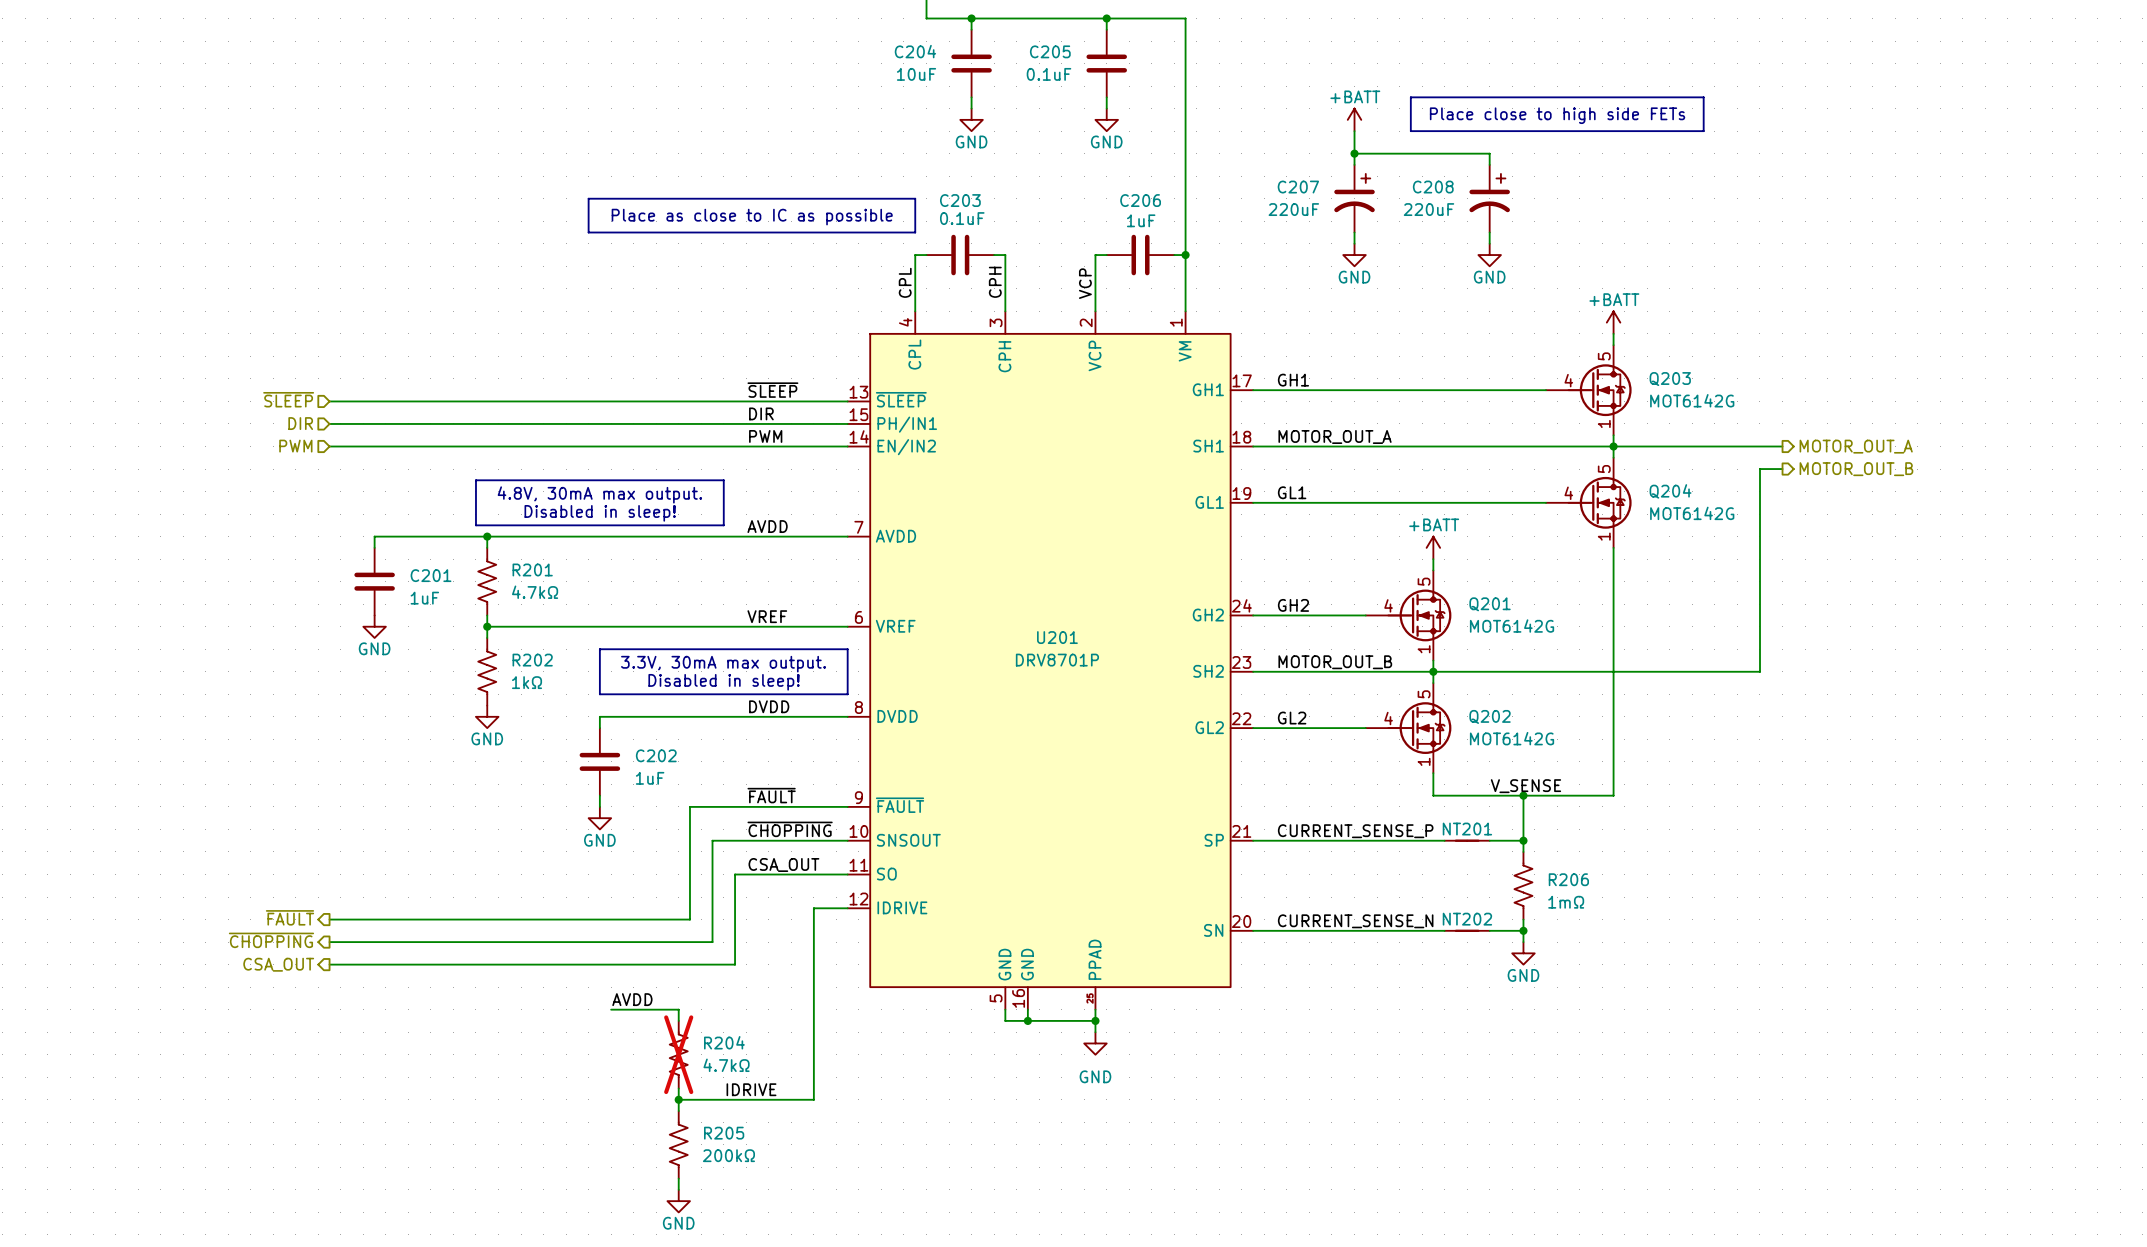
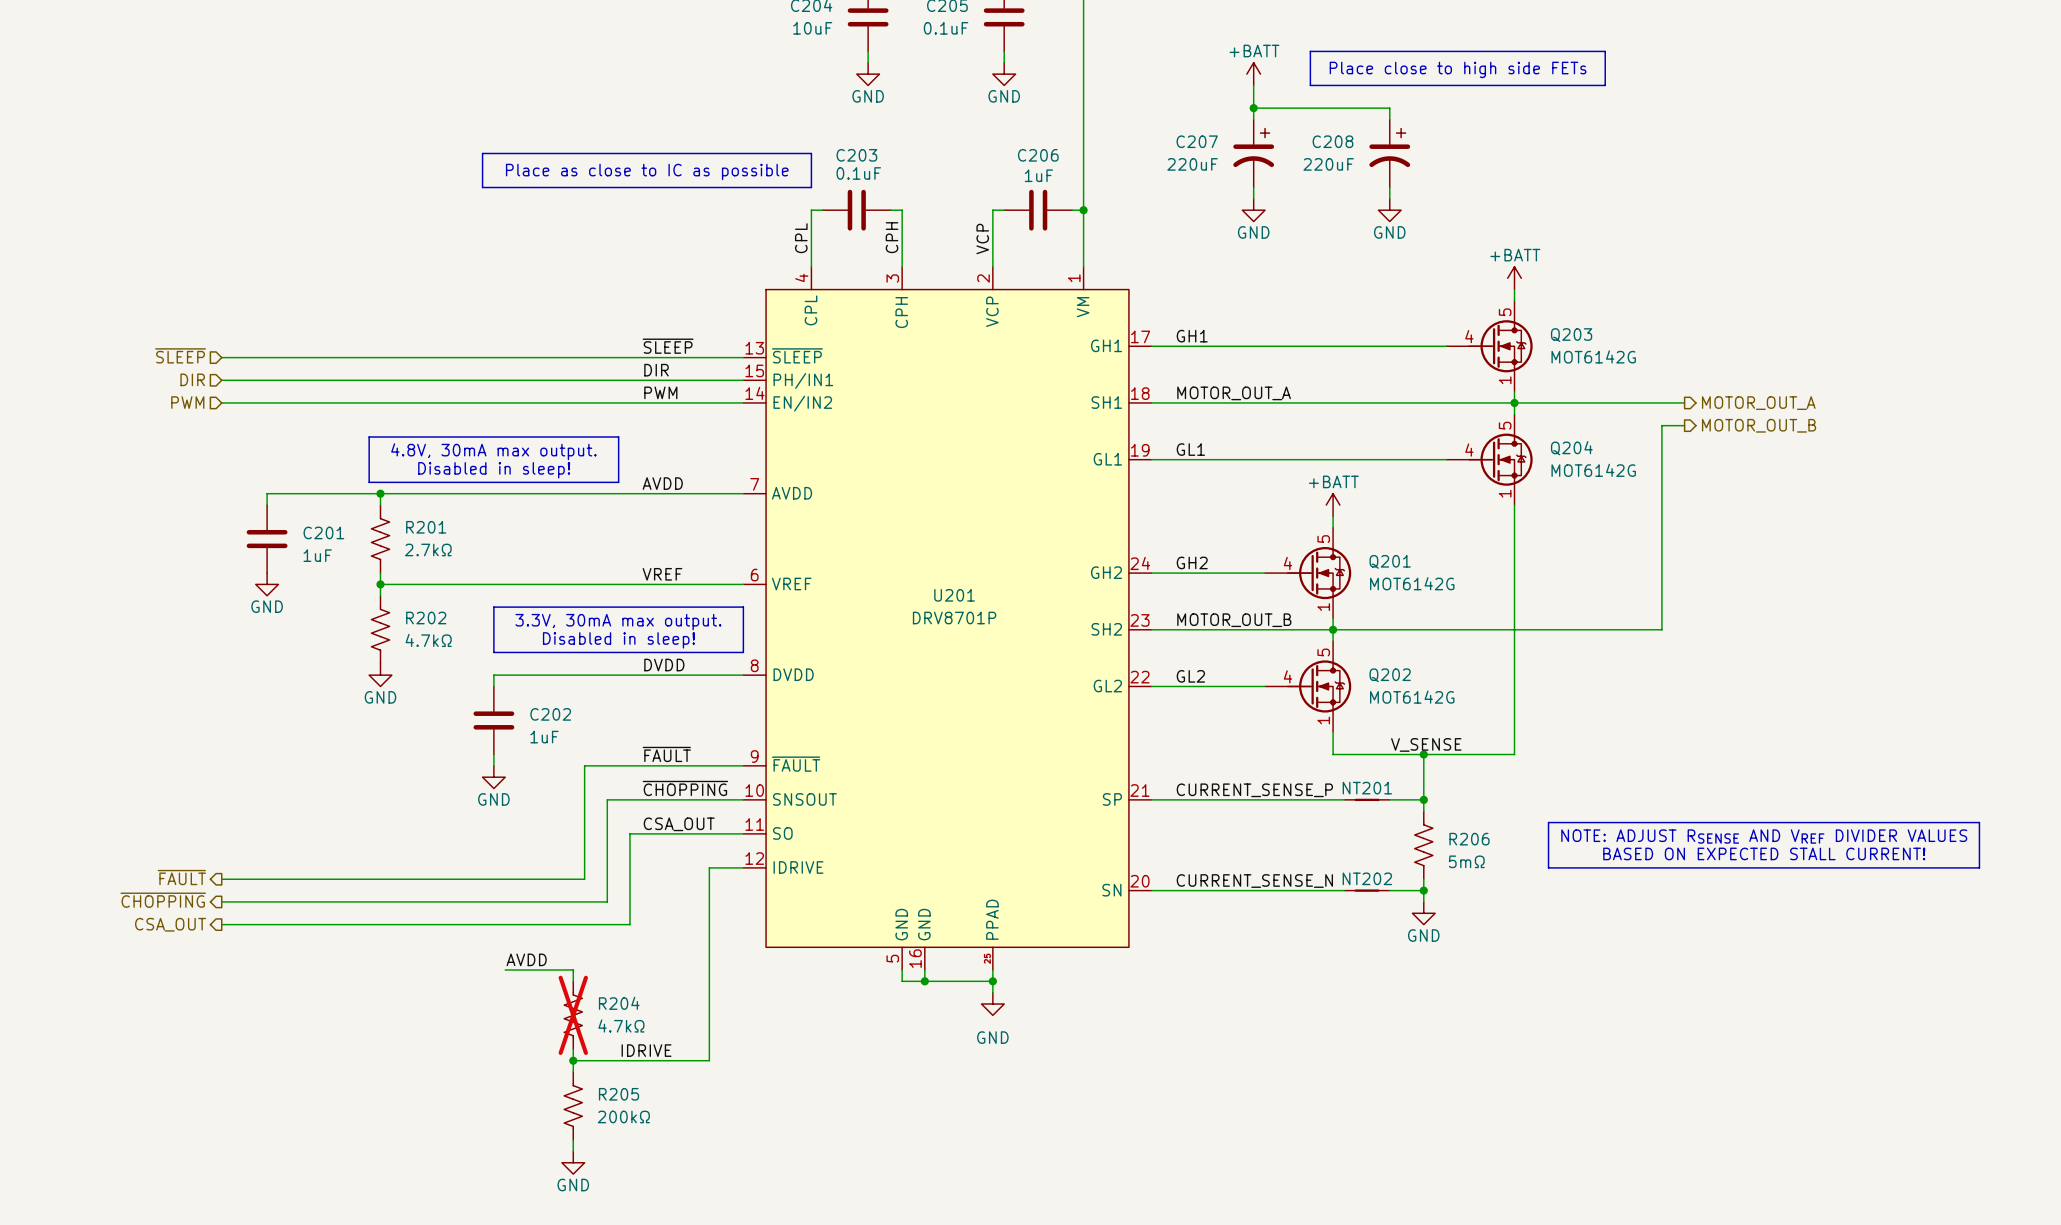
R201 value: 4.7kΩ (535, 592) -> 2.7kΩ (428, 549)
R202 value: 1kΩ (527, 682) -> 4.7kΩ (428, 640)
line: none -> (1548, 822) (1979, 822) (1979, 867) (1548, 867) (1548, 822)
text: none -> NOTE: ADJUST RSENSE AND VREF DIVIDER VALUES (1764, 836)
text: none -> BASED ON EXPECTED STALL CURRENT! (1764, 853)
R206 value: 1mΩ (1566, 902) -> 5mΩ (1466, 861)

